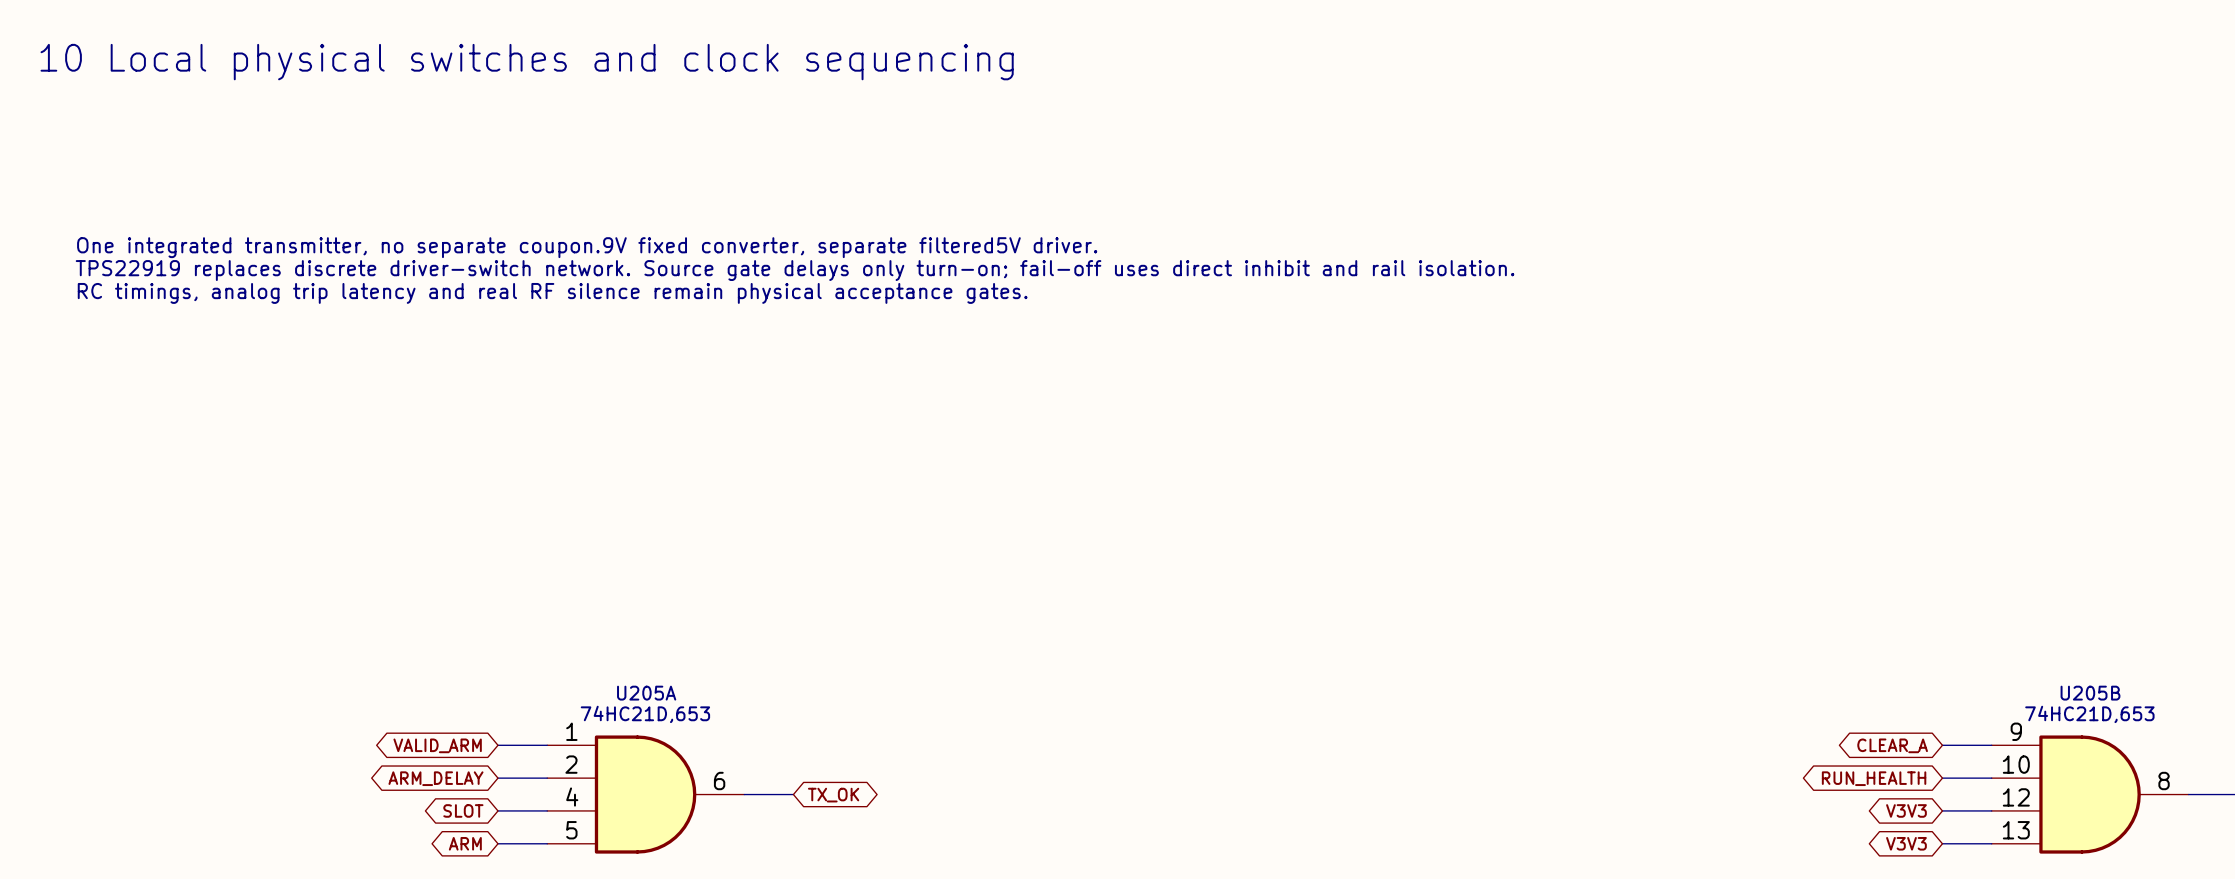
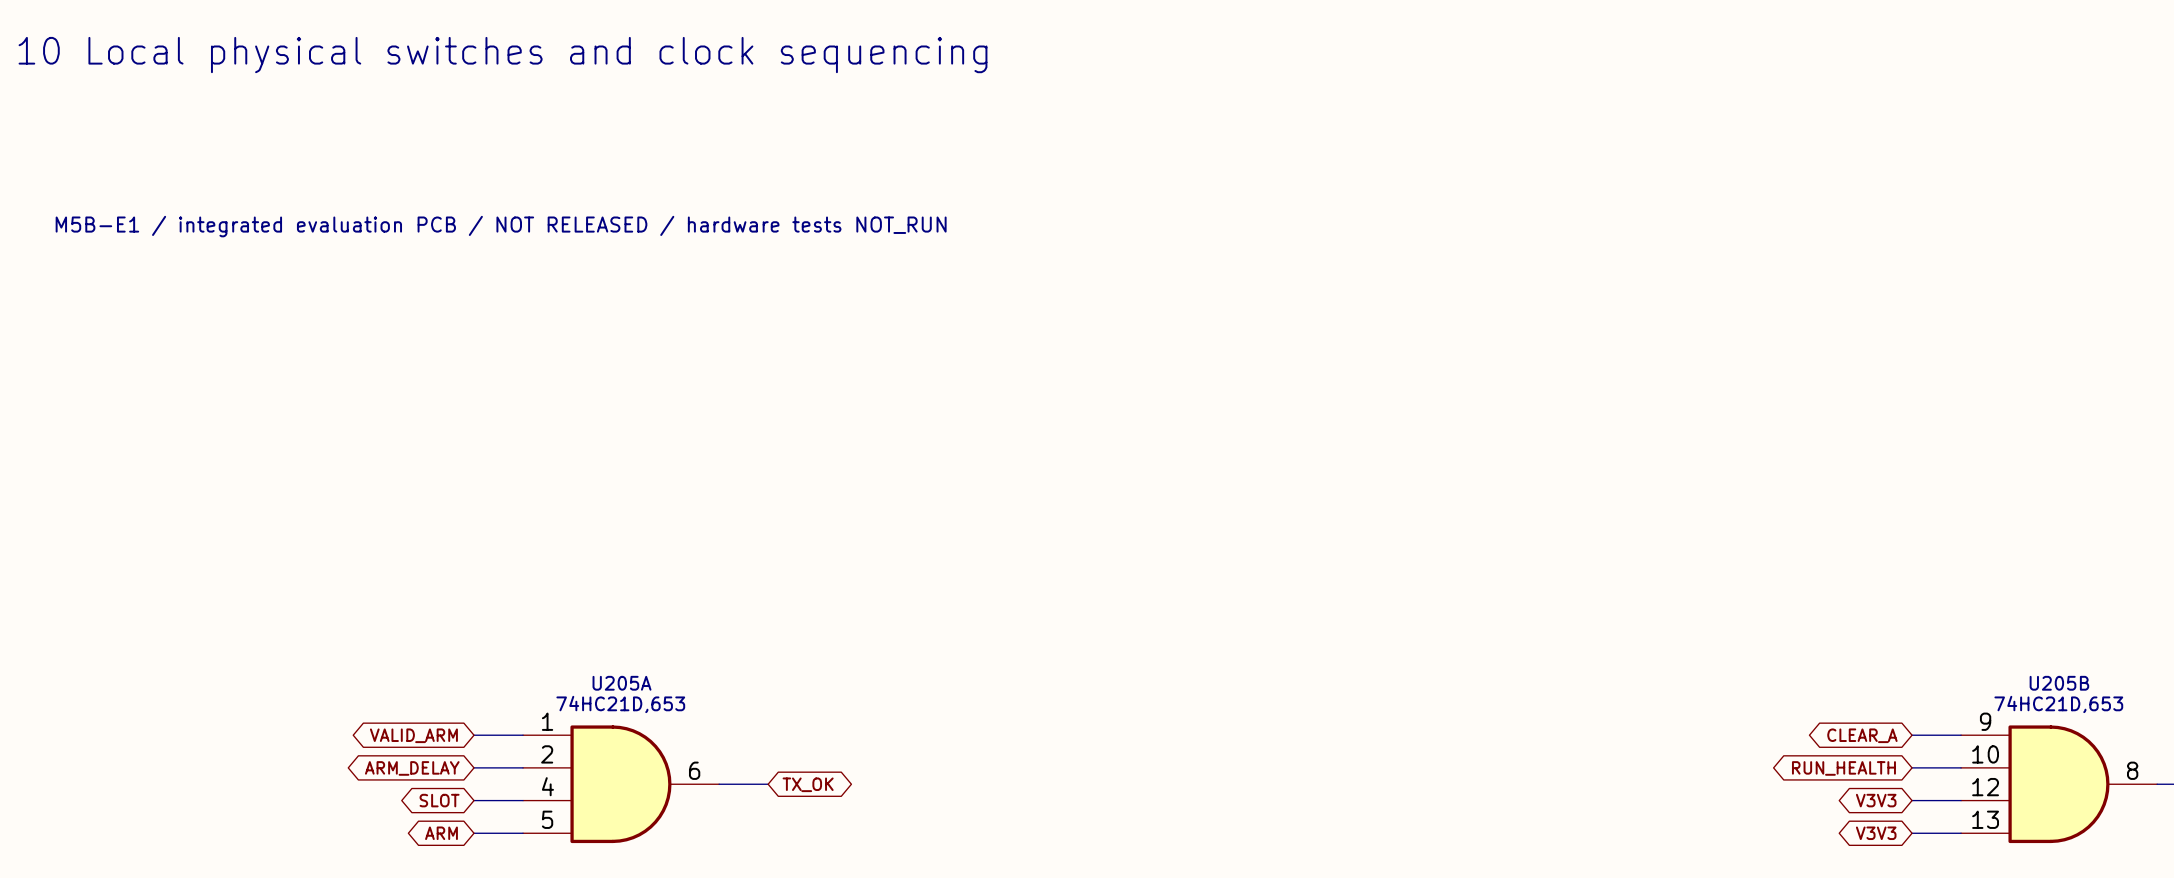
text: One integrated transmitter, no separate coupon.9V fixed converter, separate filtered5V driver. (587, 247) -> M5B-E1 / integrated evaluation PCB / NOT RELEASED / hardware tests NOT_RUN (501, 226)
text: TPS22919 replaces discrete driver-switch network. Source gate delays only turn-on; fail-off uses direct inhibit and rail isolation. (795, 270) -> none
text: RC timings, analog trip latency and real RF silence remain physical acceptance gates. (552, 293) -> none

